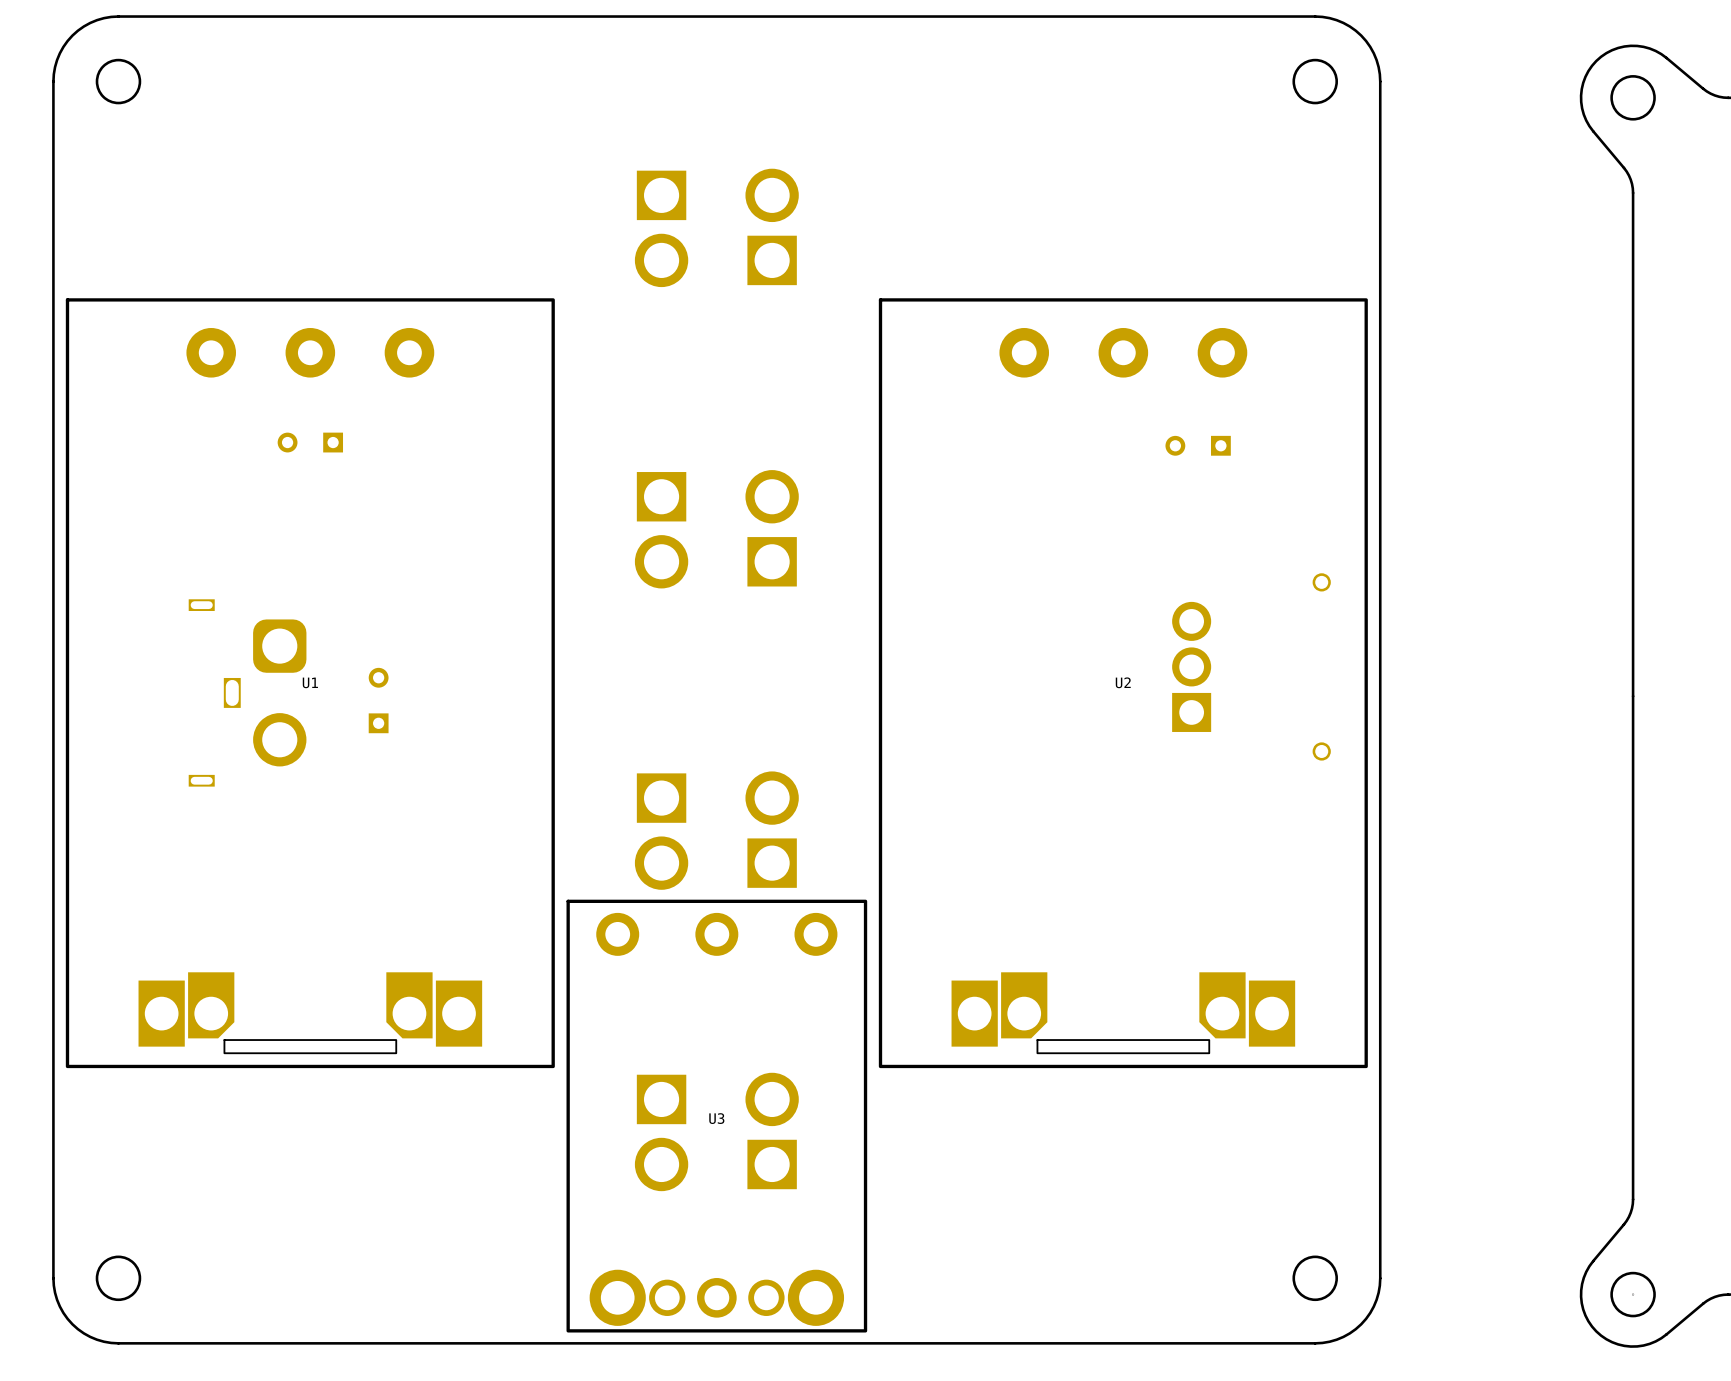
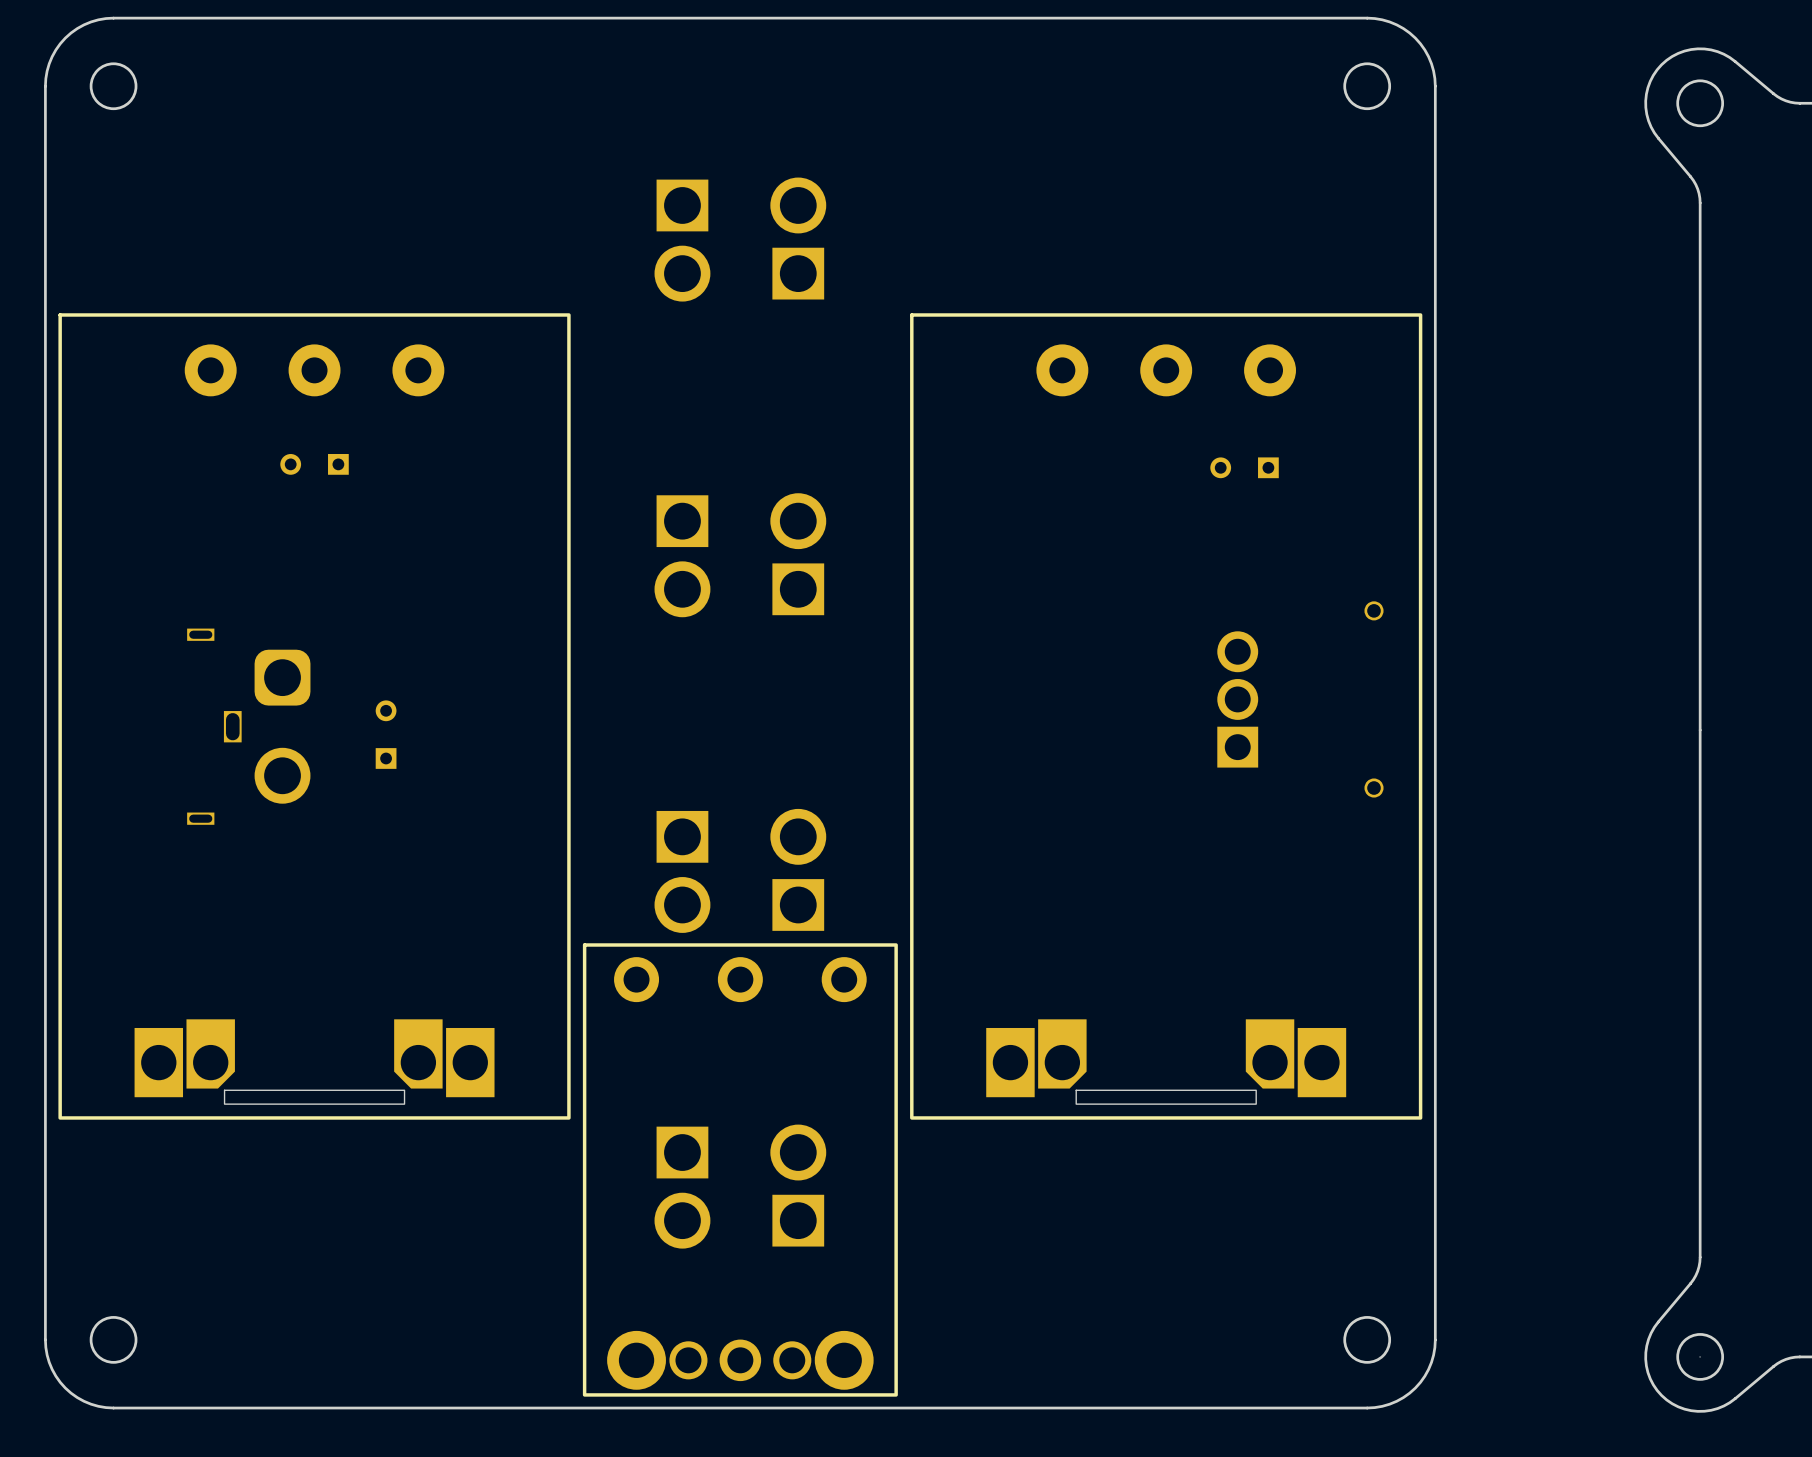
U1 name: U1 (310, 682) -> none
U2 name: U2 (1123, 682) -> none
U3 name: U3 (716, 1118) -> none

